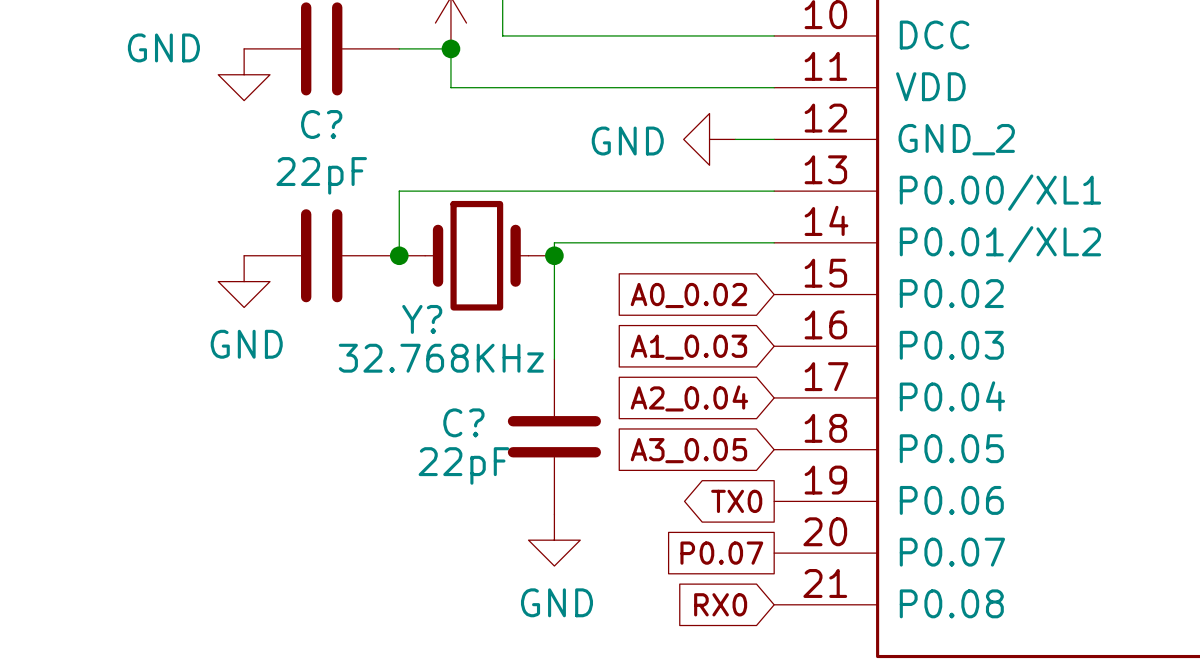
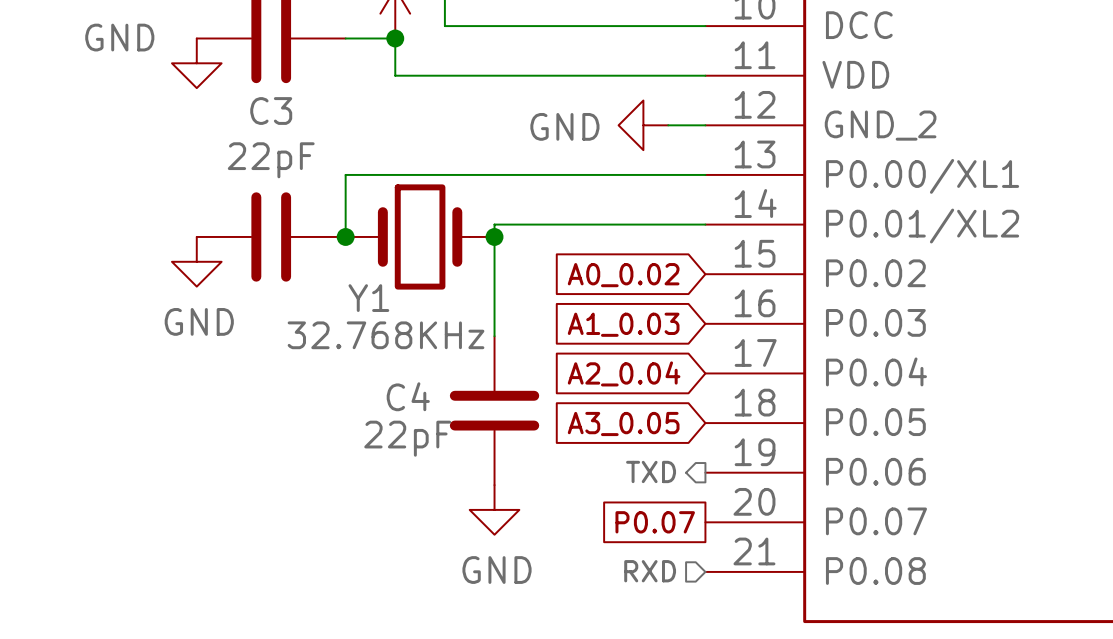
C? name: C? (321, 124) -> C3 (271, 111)
Y? name: Y? (422, 319) -> Y1 (368, 298)
C? name: C? (463, 422) -> C4 (408, 396)
hierarchical label: none -> TXD (651, 471)
global label: TX0 (736, 501) -> none
hierarchical label: none -> RXD (650, 571)
global label: RX0 (720, 604) -> none

